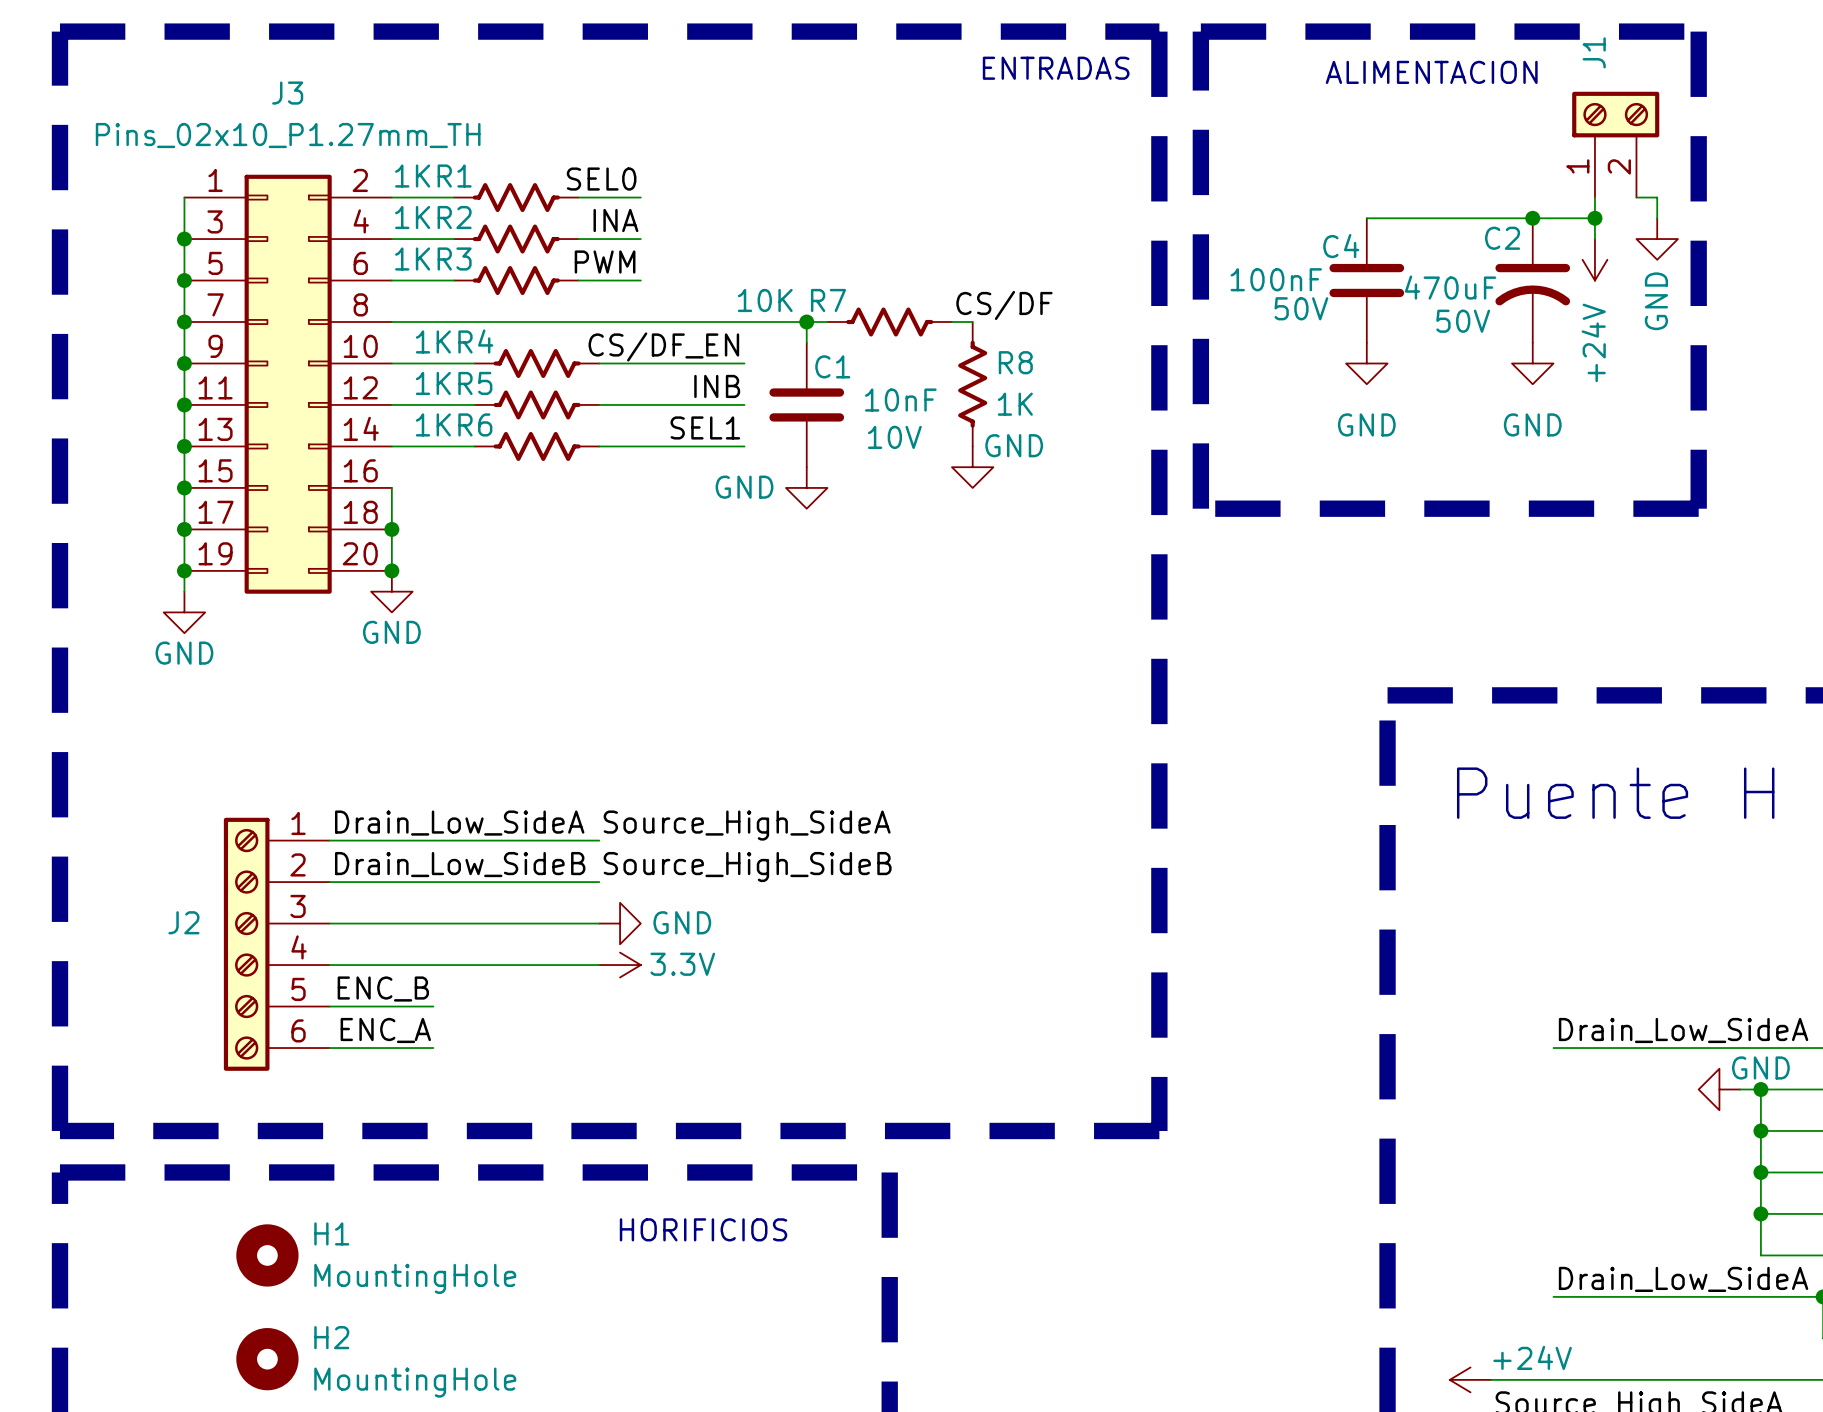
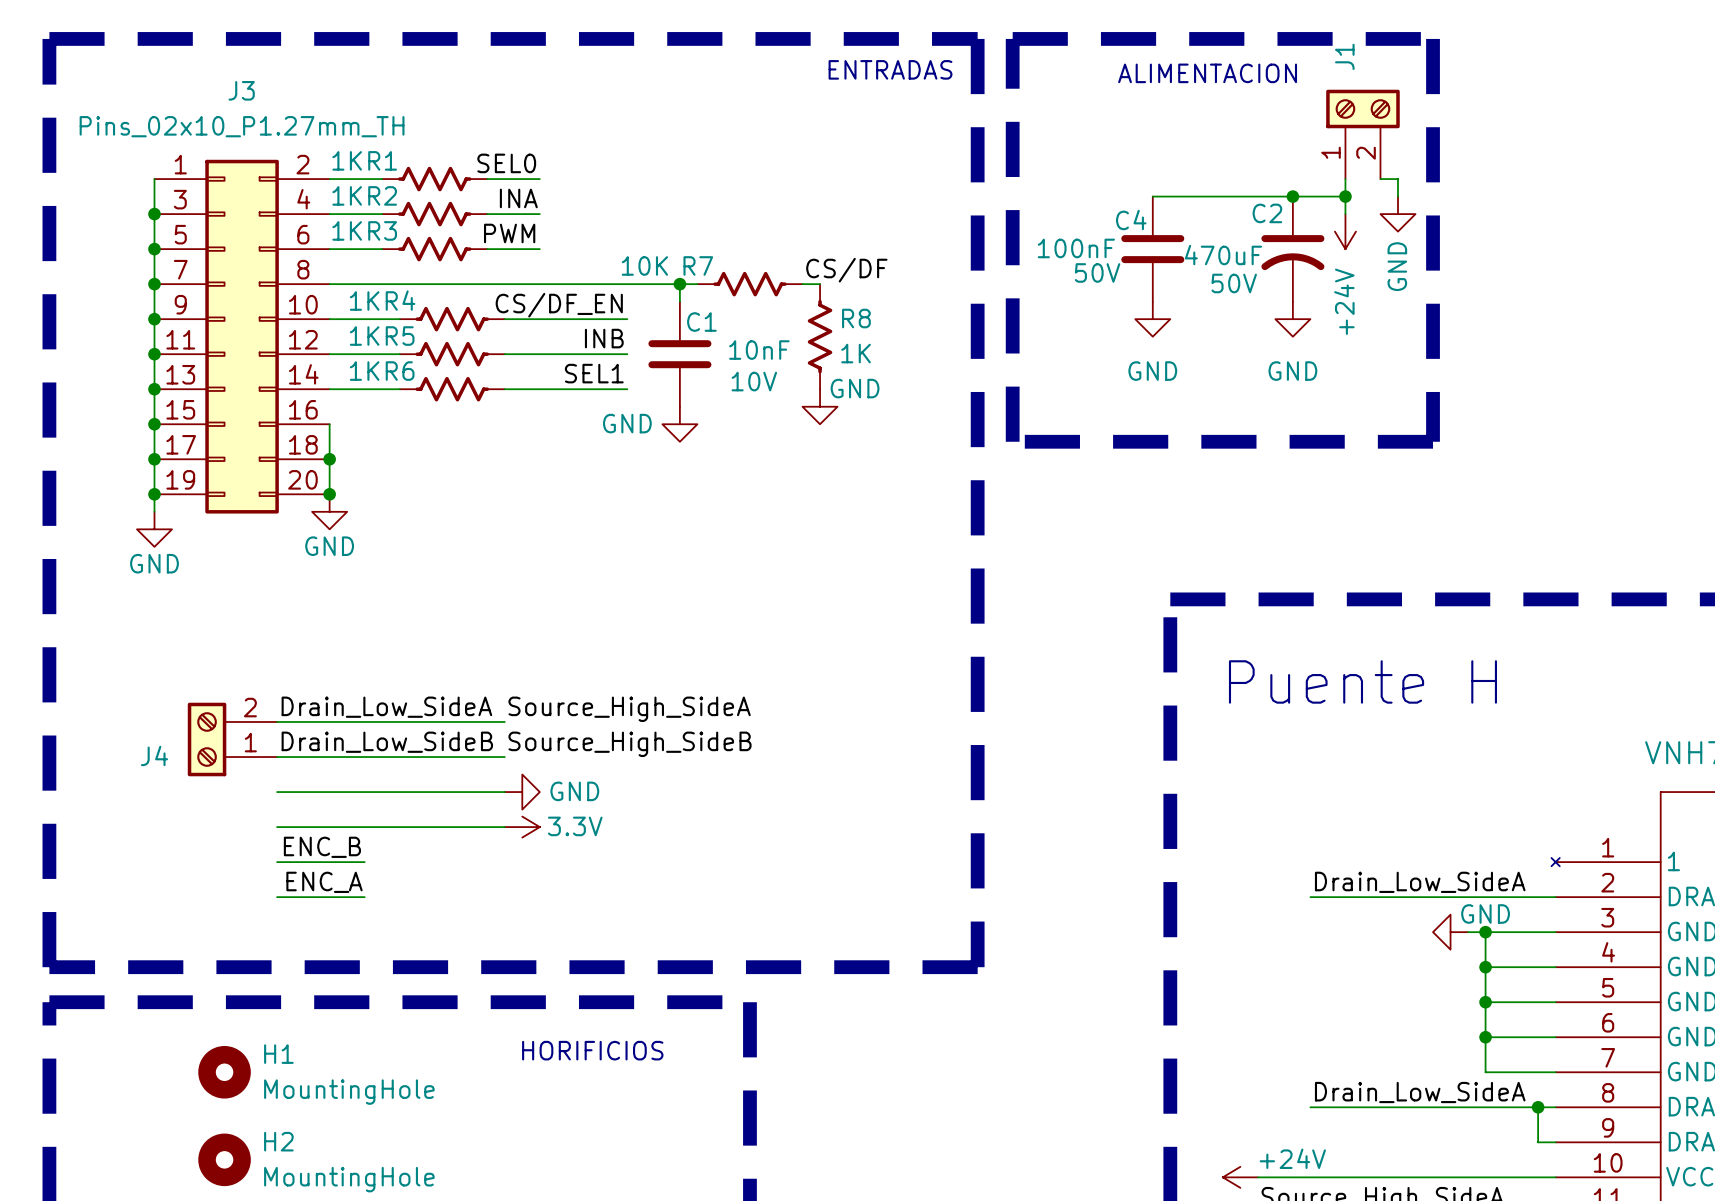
J4: none -> (232, 739)
J2: (276, 944) -> none

